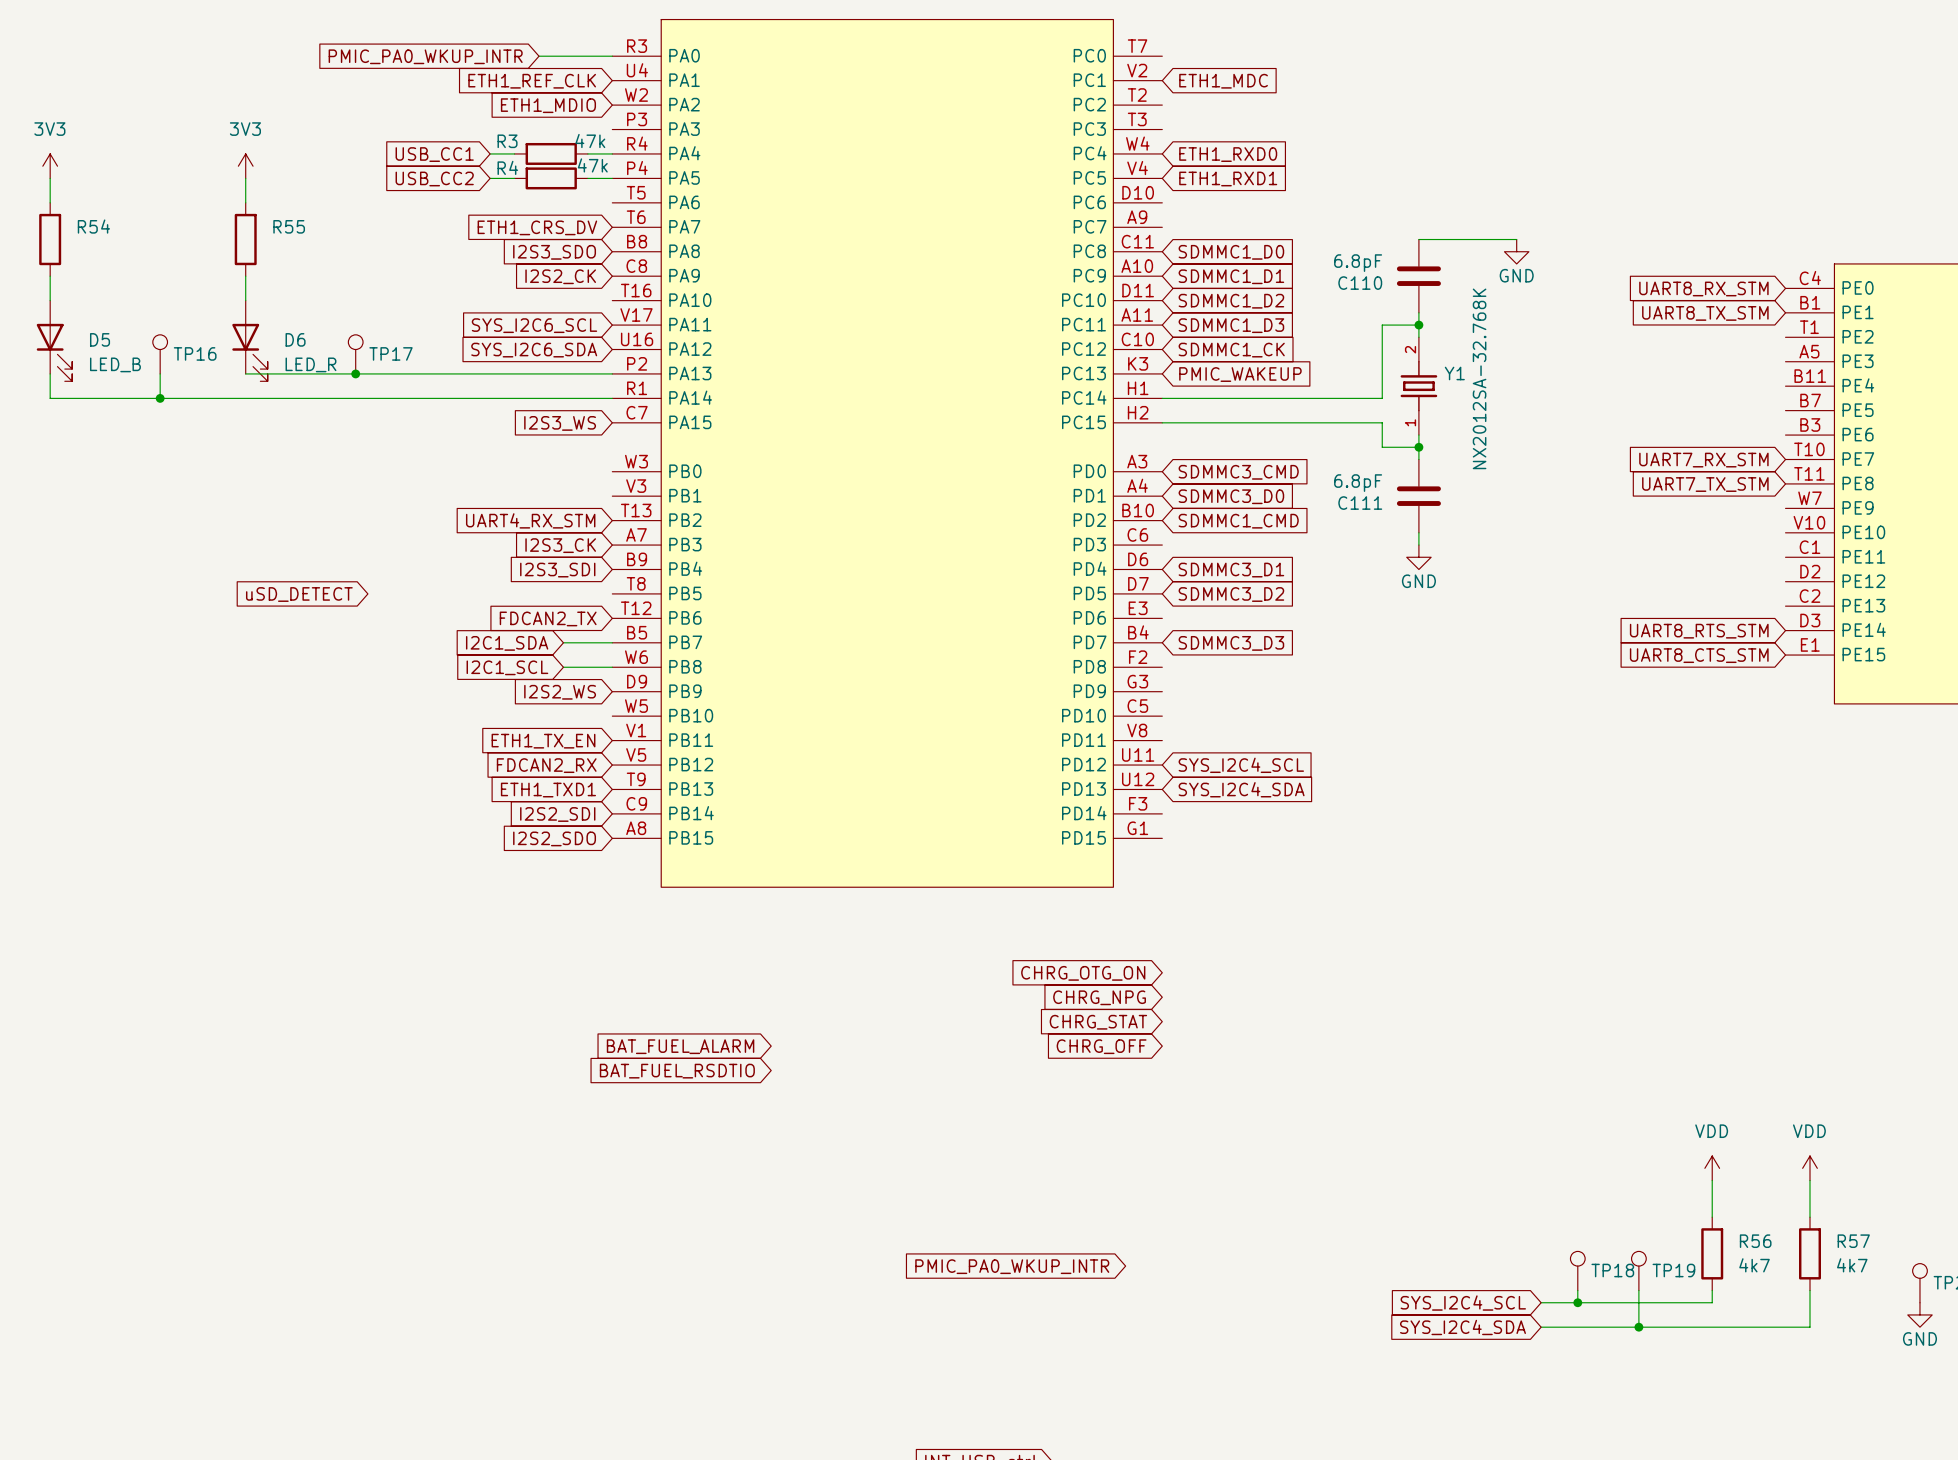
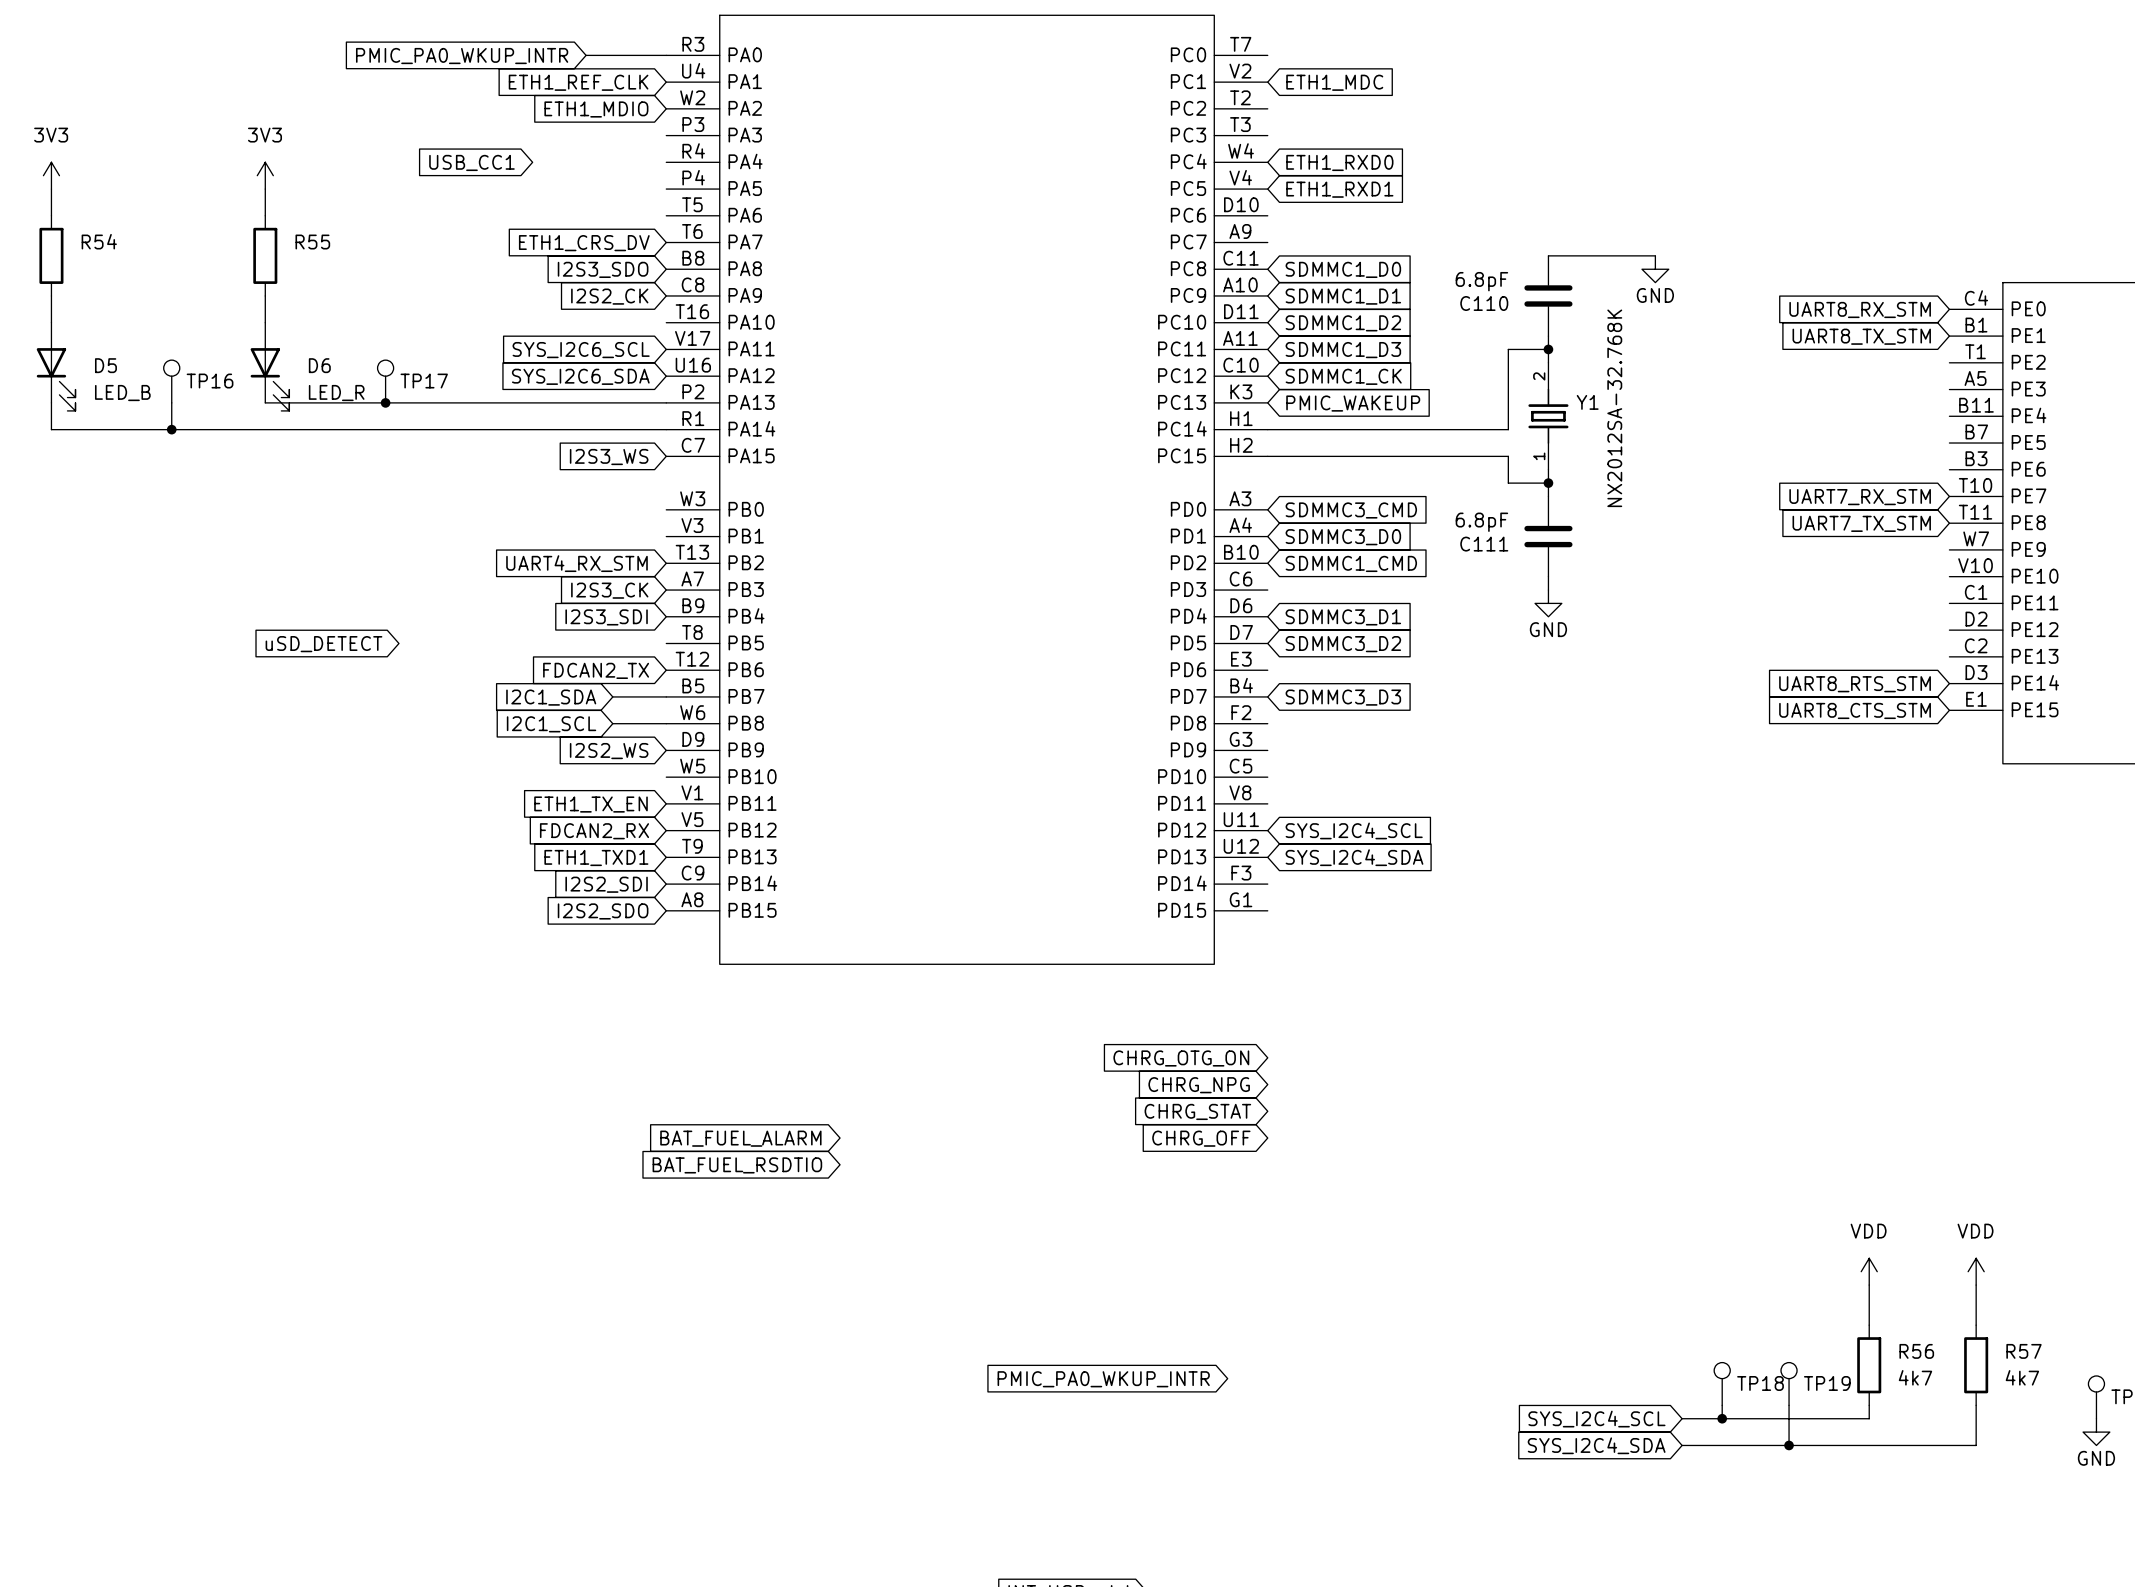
wire: (490, 153) (514, 153) -> none
R3: 47k (551, 153) -> none
wire: (587, 153) (612, 153) -> none
global label: USB_CC2 (434, 178) -> none
wire: (490, 178) (514, 178) -> none
R4: 47k (551, 178) -> none
wire: (587, 178) (612, 178) -> none

